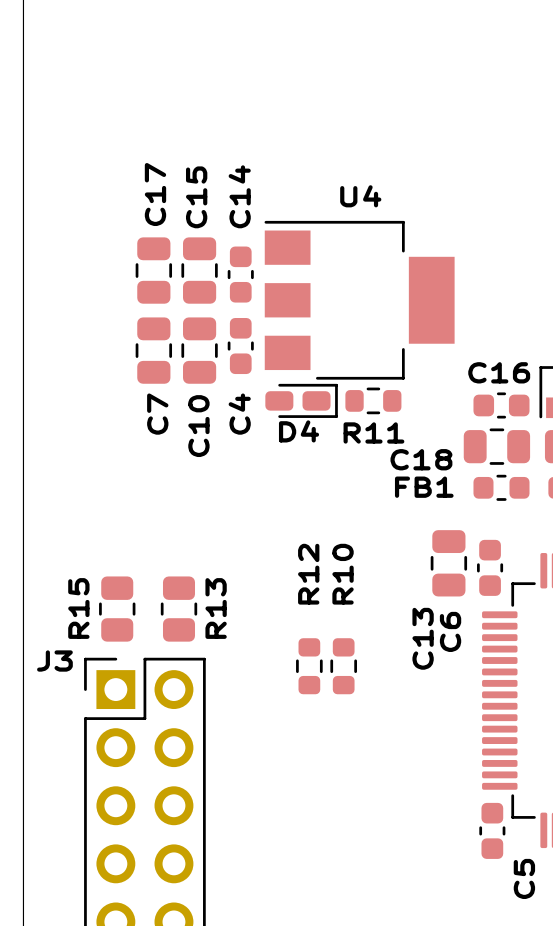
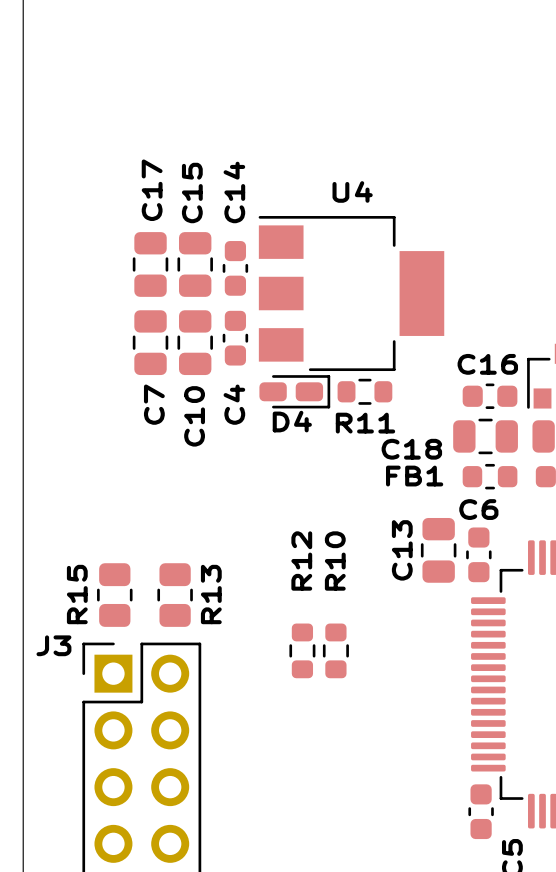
C6 name rotation: 0° (450, 631) -> 90° clockwise (478, 509)
C6 name position: C6 (450, 631) -> C6 (478, 509)
C13 name position: C13 (423, 638) -> C13 (402, 550)

